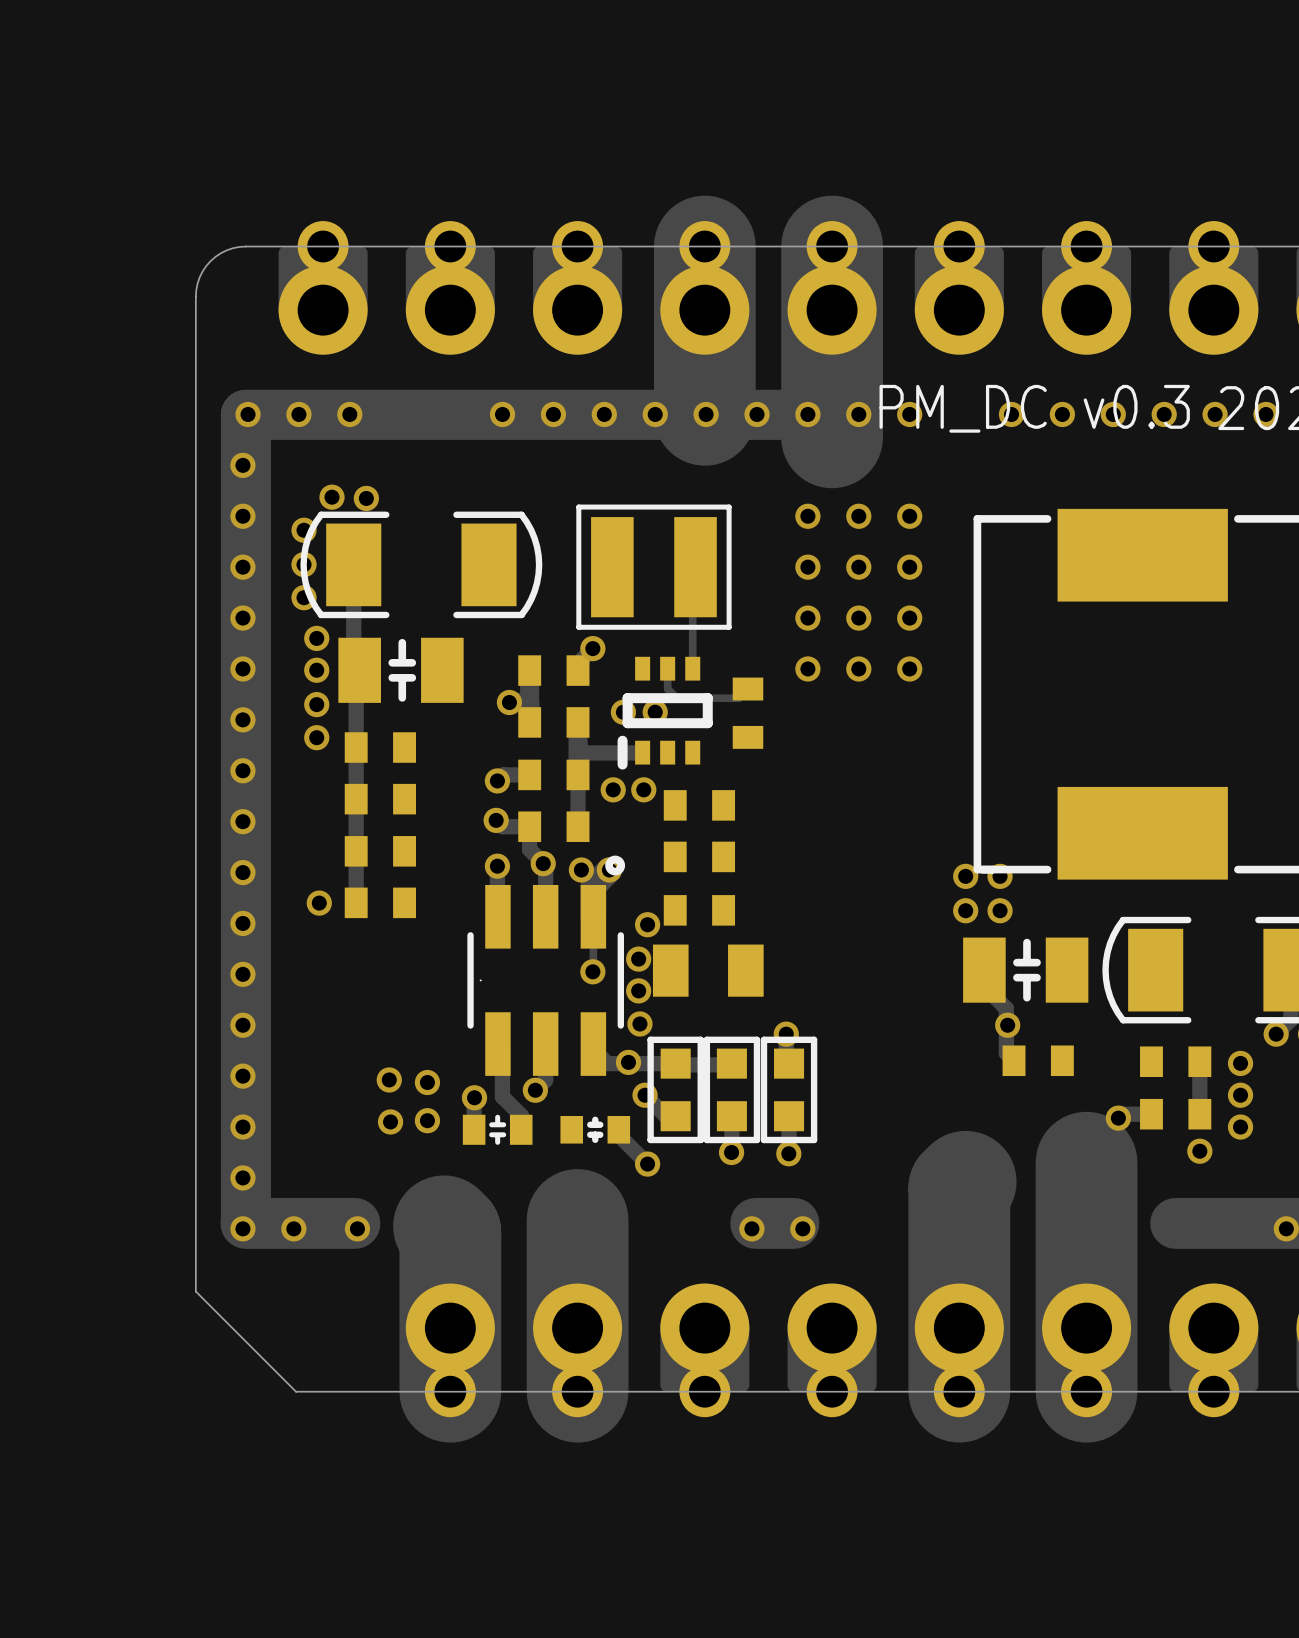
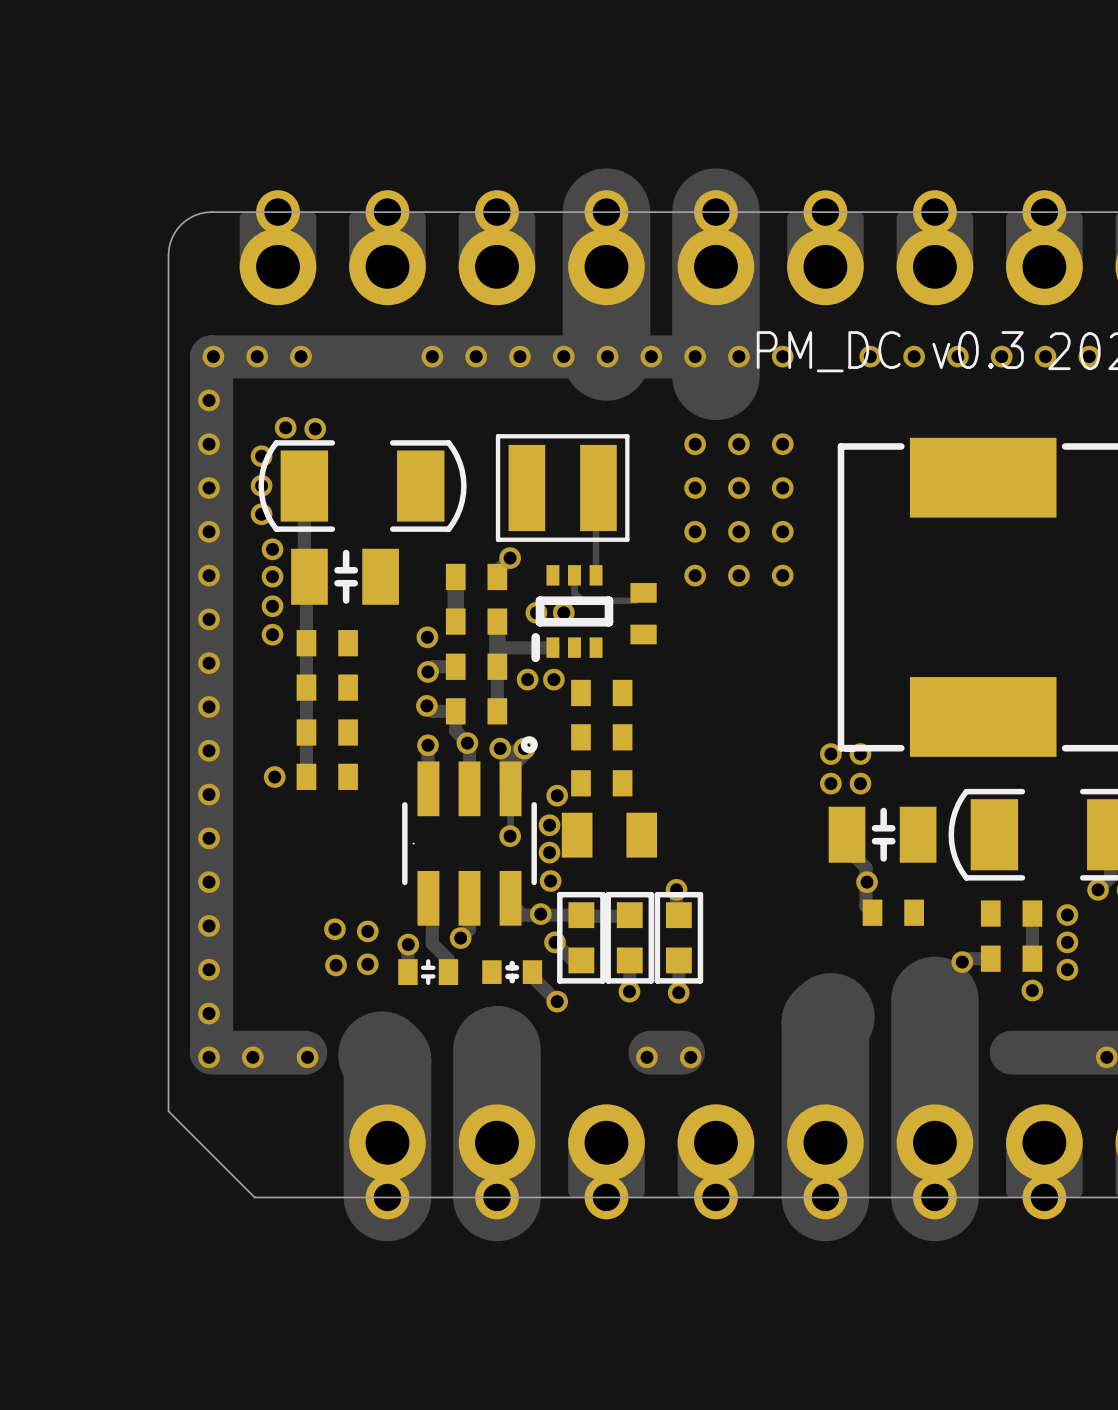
via position: (509, 702) -> (427, 637)

